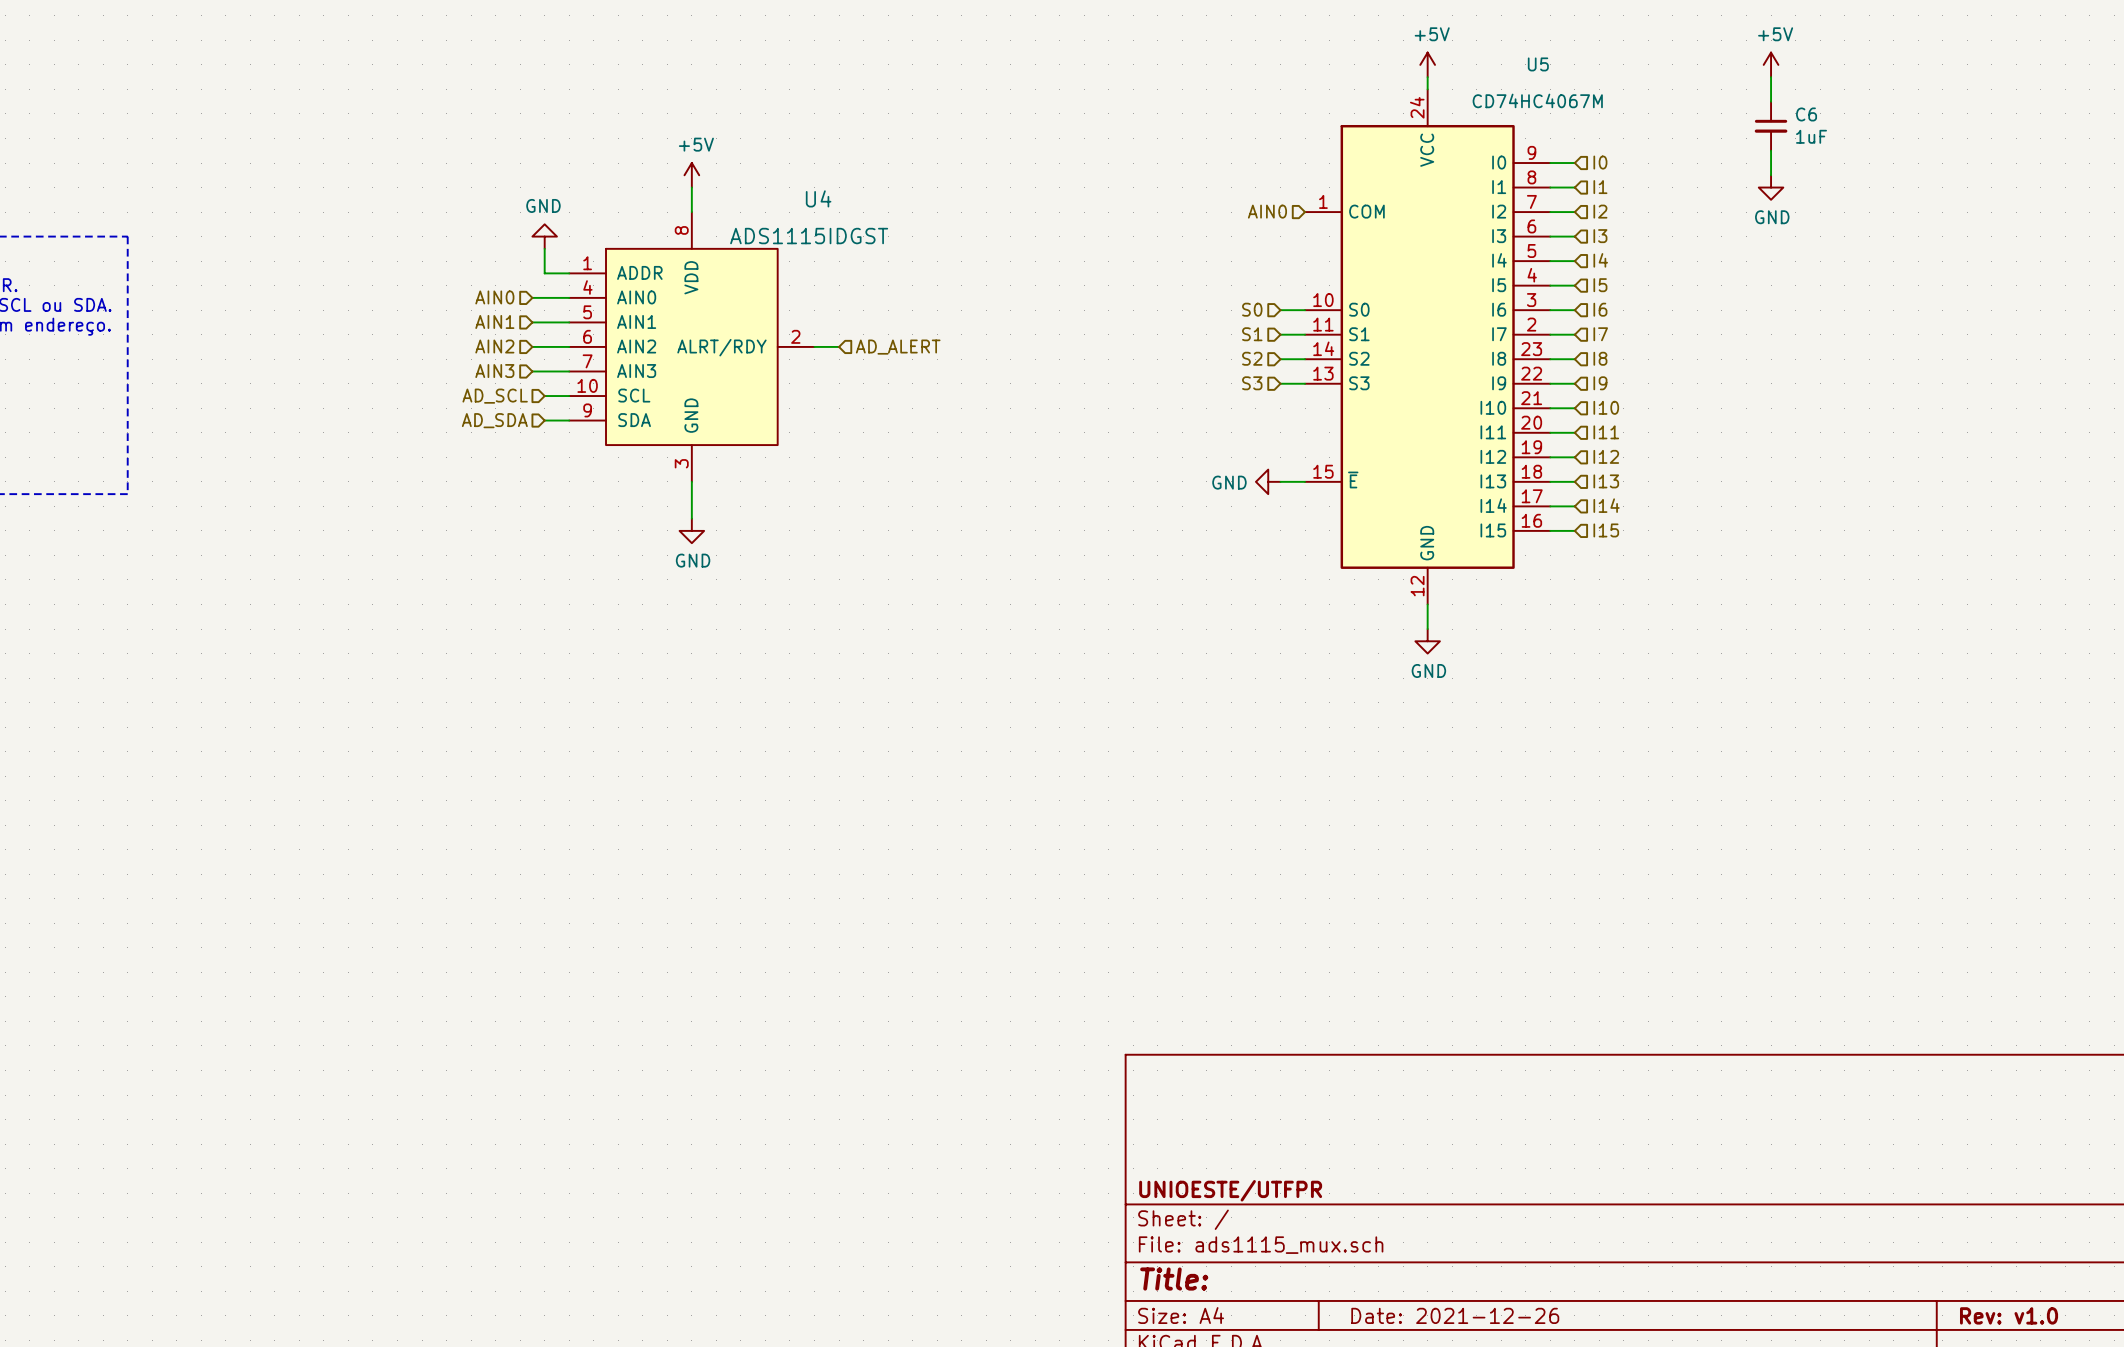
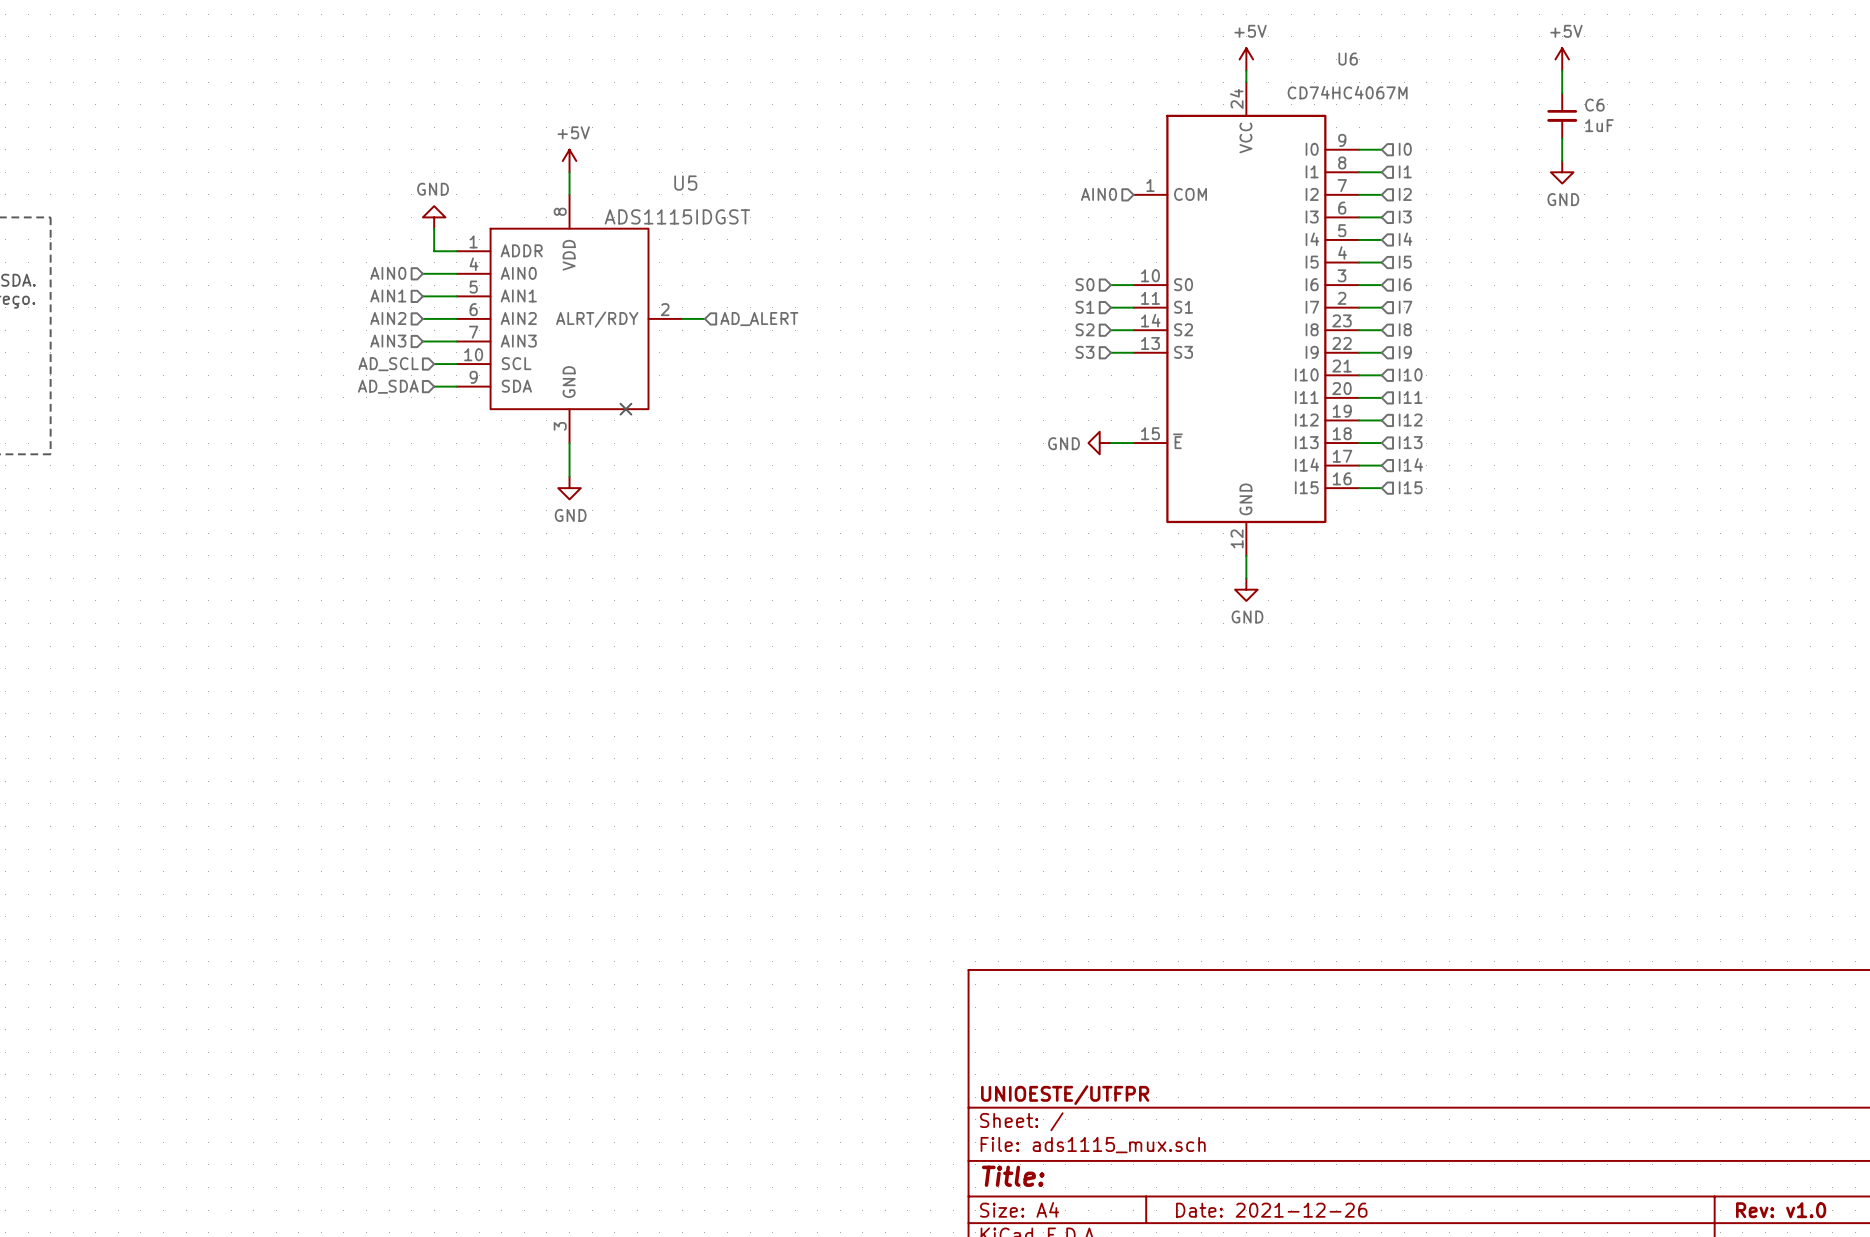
U5 name: U5 (1538, 64) -> U6 (1348, 59)
U4 name: U4 (818, 198) -> U5 (685, 183)
no-connect mark: none -> (625, 409)

